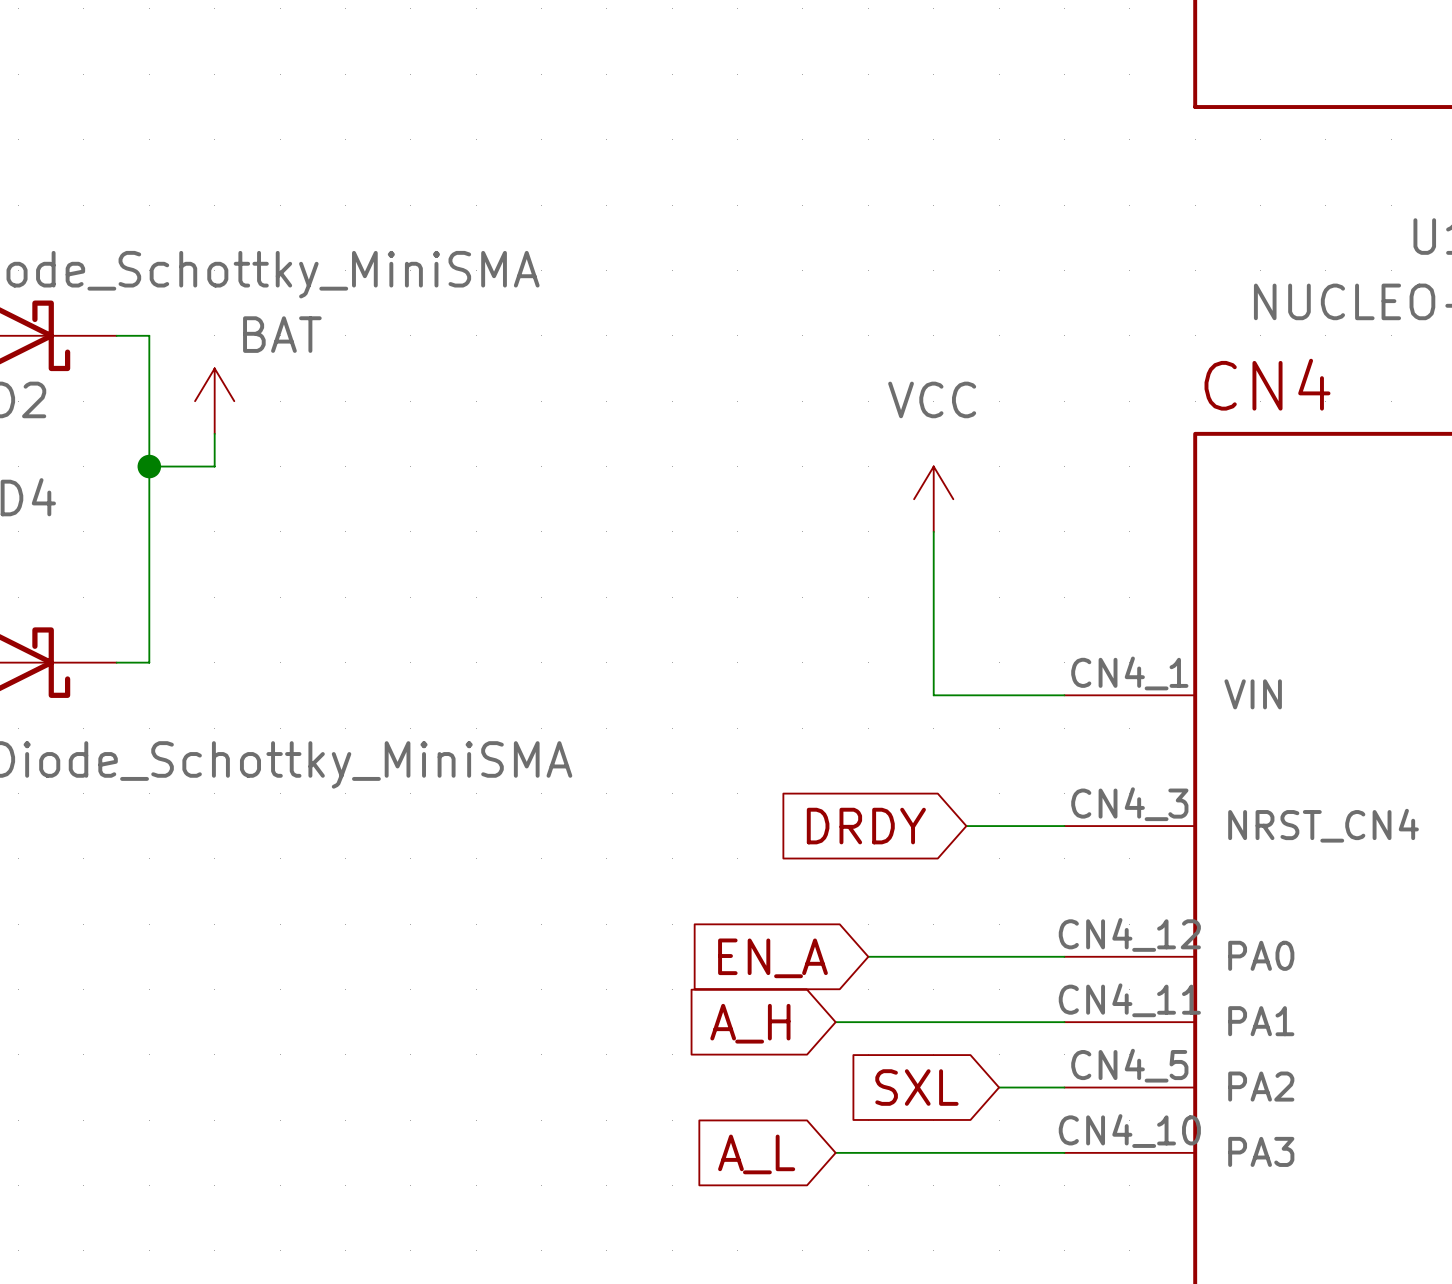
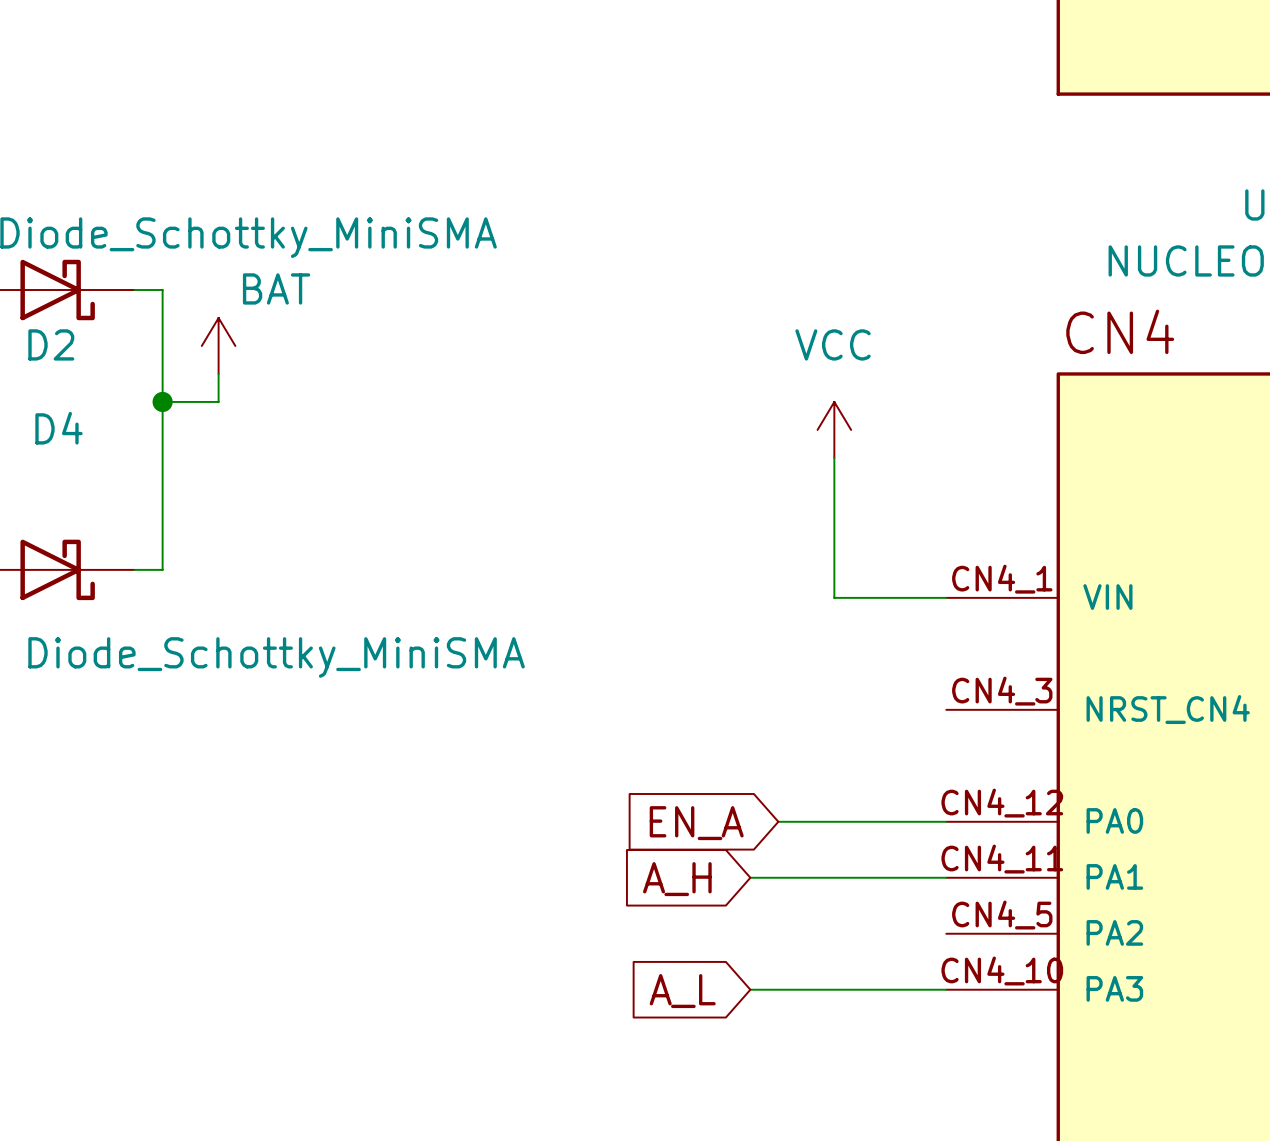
global label: DRDY (866, 826) -> none
wire: (966, 826) (1064, 826) -> none
global label: SXL (916, 1087) -> none
wire: (999, 1087) (1064, 1087) -> none

